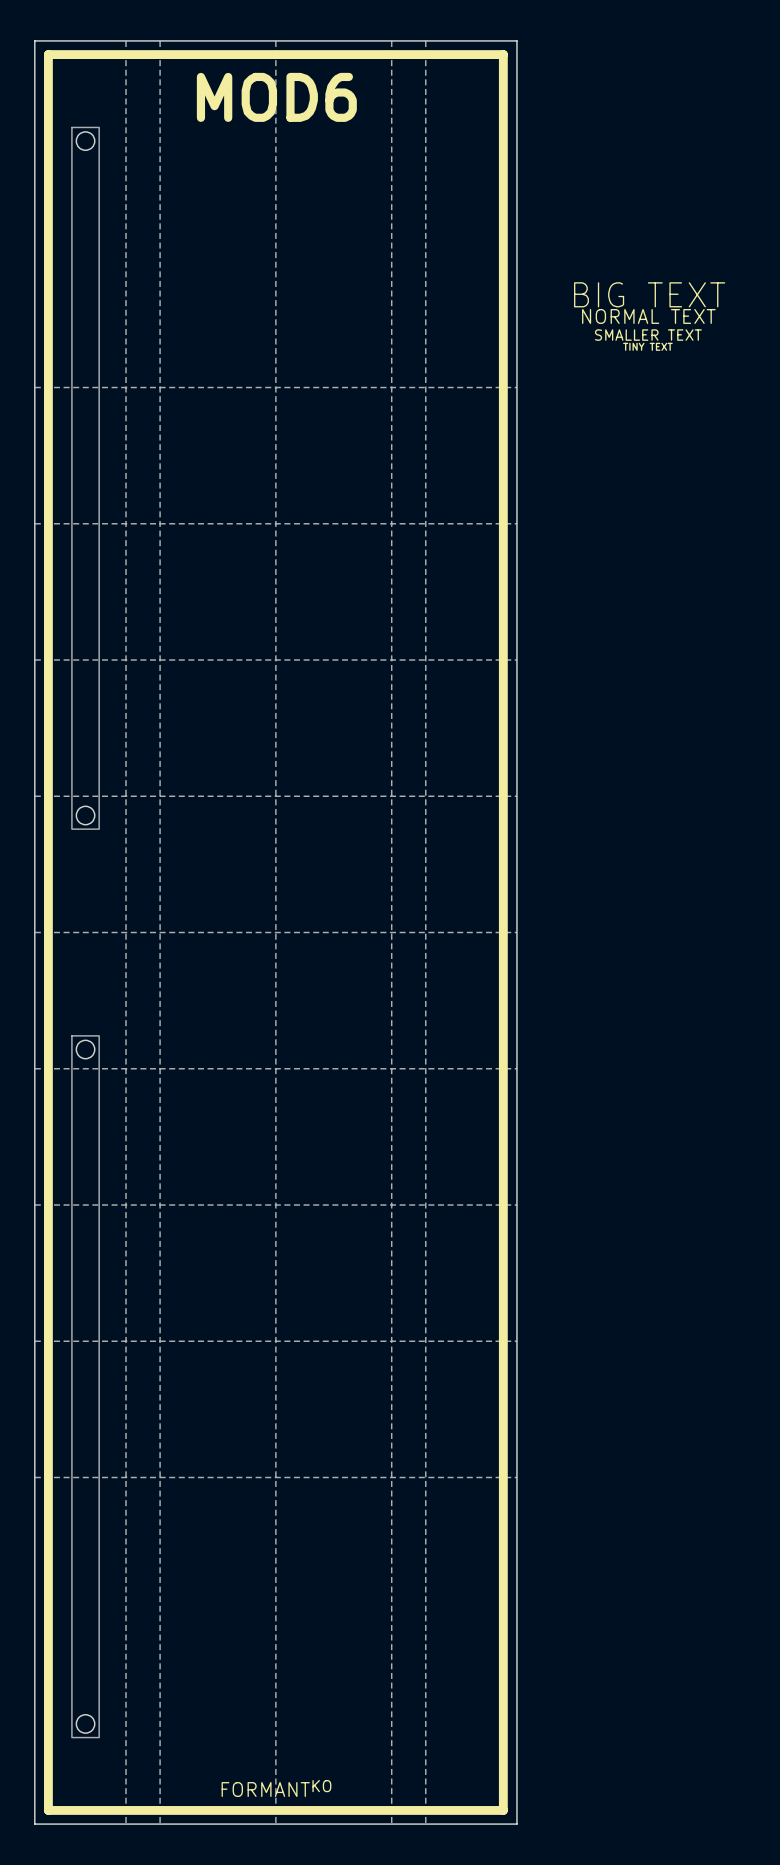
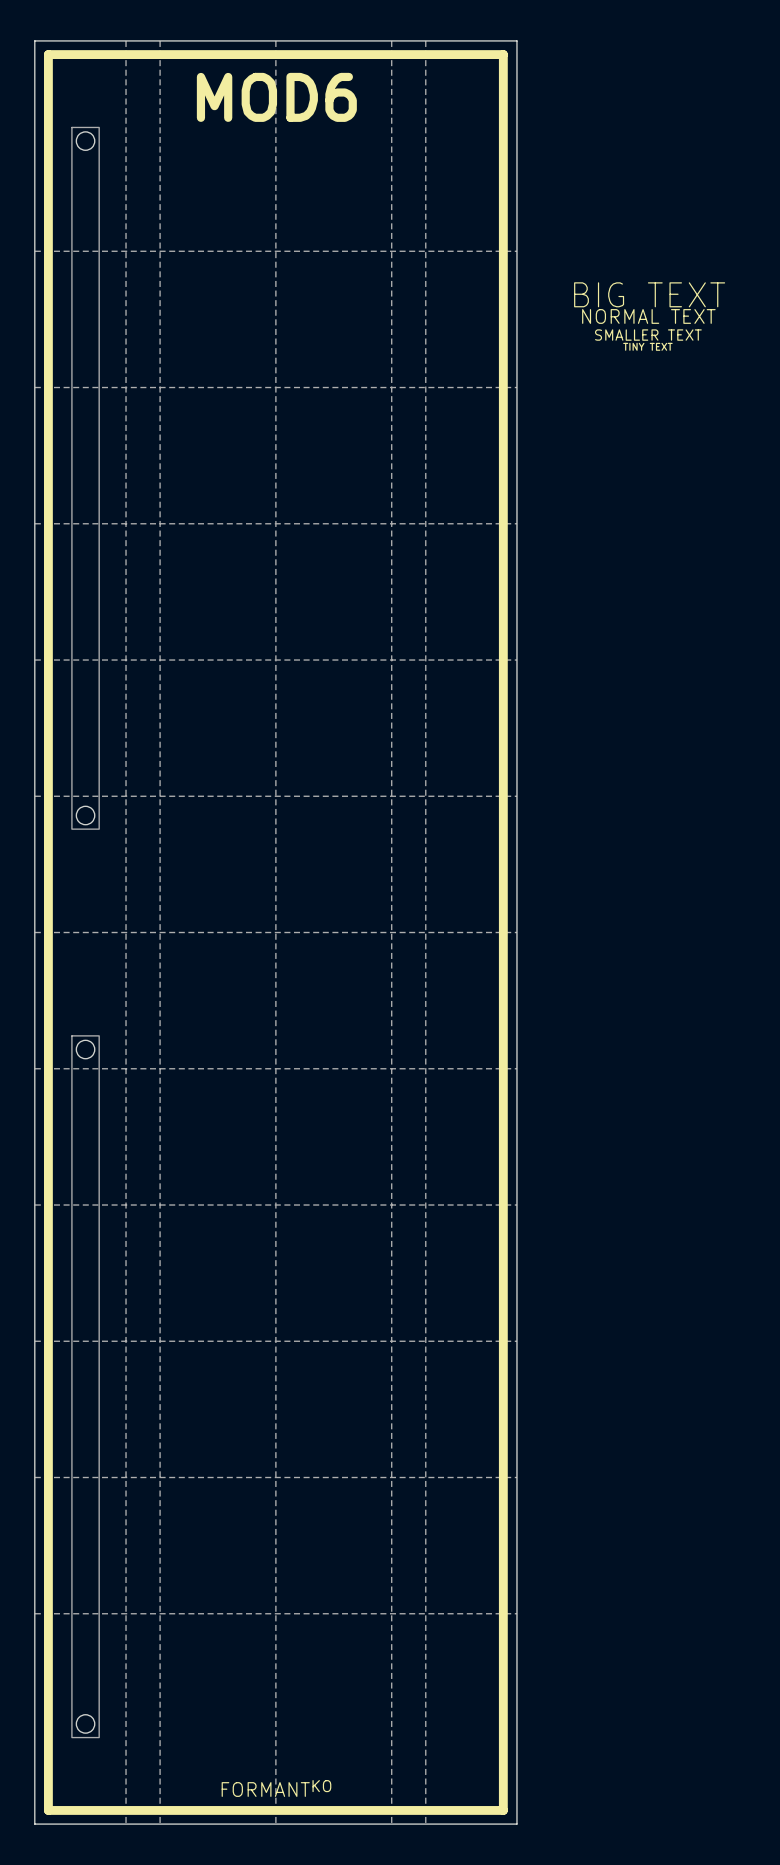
line: none -> (34, 251) (516, 251)
line: none -> (34, 1613) (516, 1613)

